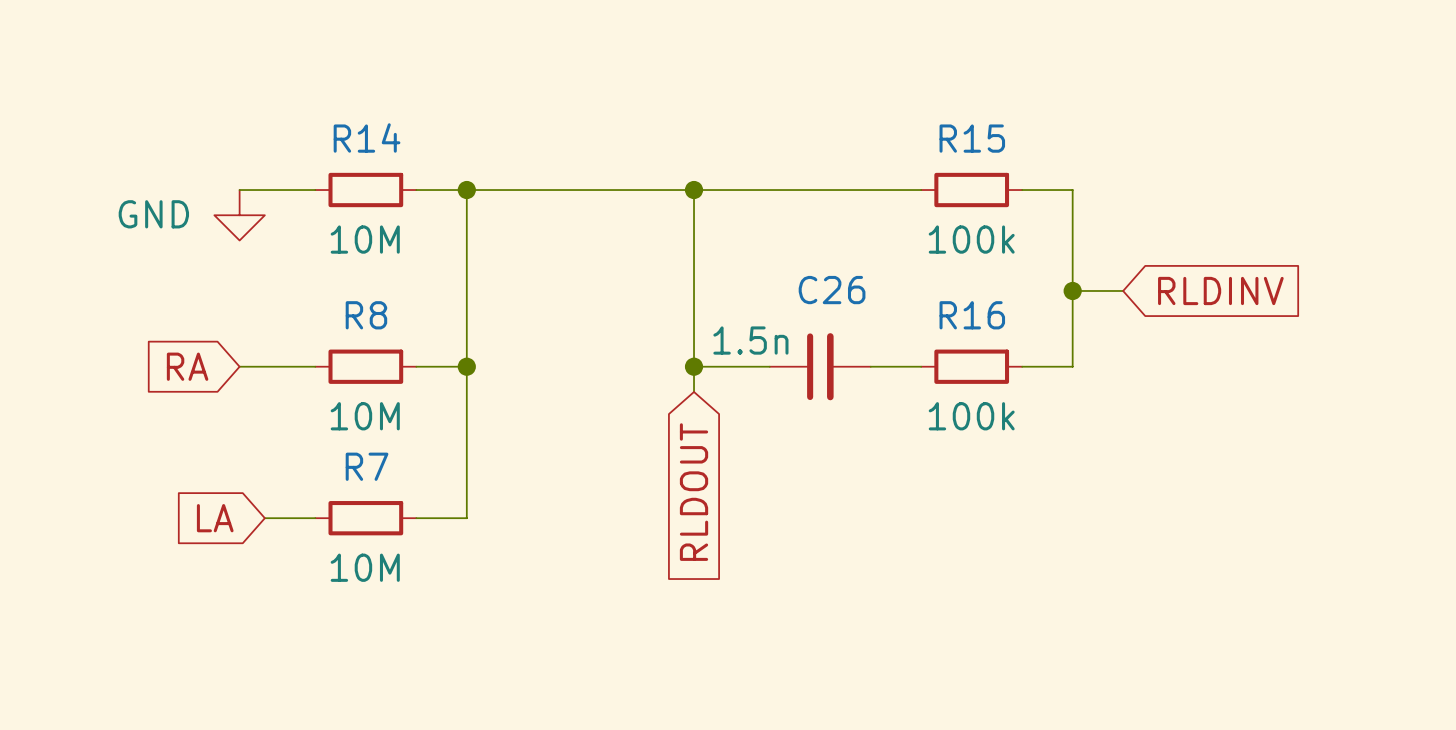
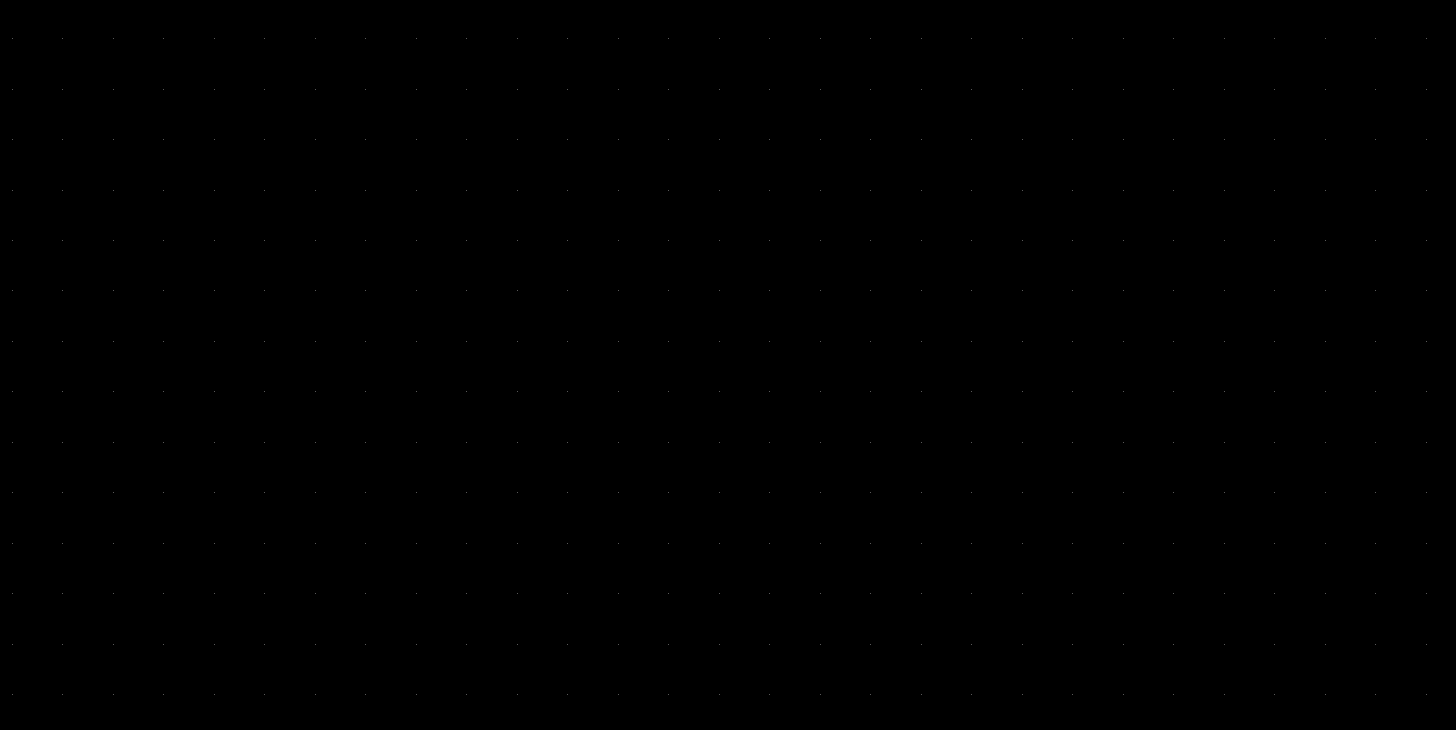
wire: (239, 190) (315, 190) -> none
R14: 10M (365, 190) -> none
wire: (416, 190) (921, 190) -> none
wire: (466, 190) (466, 518) (416, 518) -> none
junction: (466, 190) -> none
wire: (694, 190) (694, 391) -> none
junction: (694, 190) -> none
R15: 100k (971, 190) -> none
wire: (1022, 190) (1072, 190) (1072, 366) (1022, 366) -> none
power symbol: GND (239, 215) -> none
wire: (1072, 290) (1123, 290) -> none
junction: (1072, 290) -> none
global label: RLDINV (1220, 290) -> none
global label: RA (187, 366) -> none
wire: (239, 366) (315, 366) -> none
R8: 10M (365, 366) -> none
wire: (416, 366) (466, 366) -> none
junction: (466, 366) -> none
wire: (694, 366) (769, 366) -> none
junction: (694, 366) -> none
C26: 1.5n (820, 366) -> none
wire: (870, 366) (921, 366) -> none
R16: 100k (971, 366) -> none
global label: RLDOUT (694, 492) -> none
global label: LA (215, 518) -> none
wire: (264, 518) (315, 518) -> none
R7: 10M (365, 518) -> none

